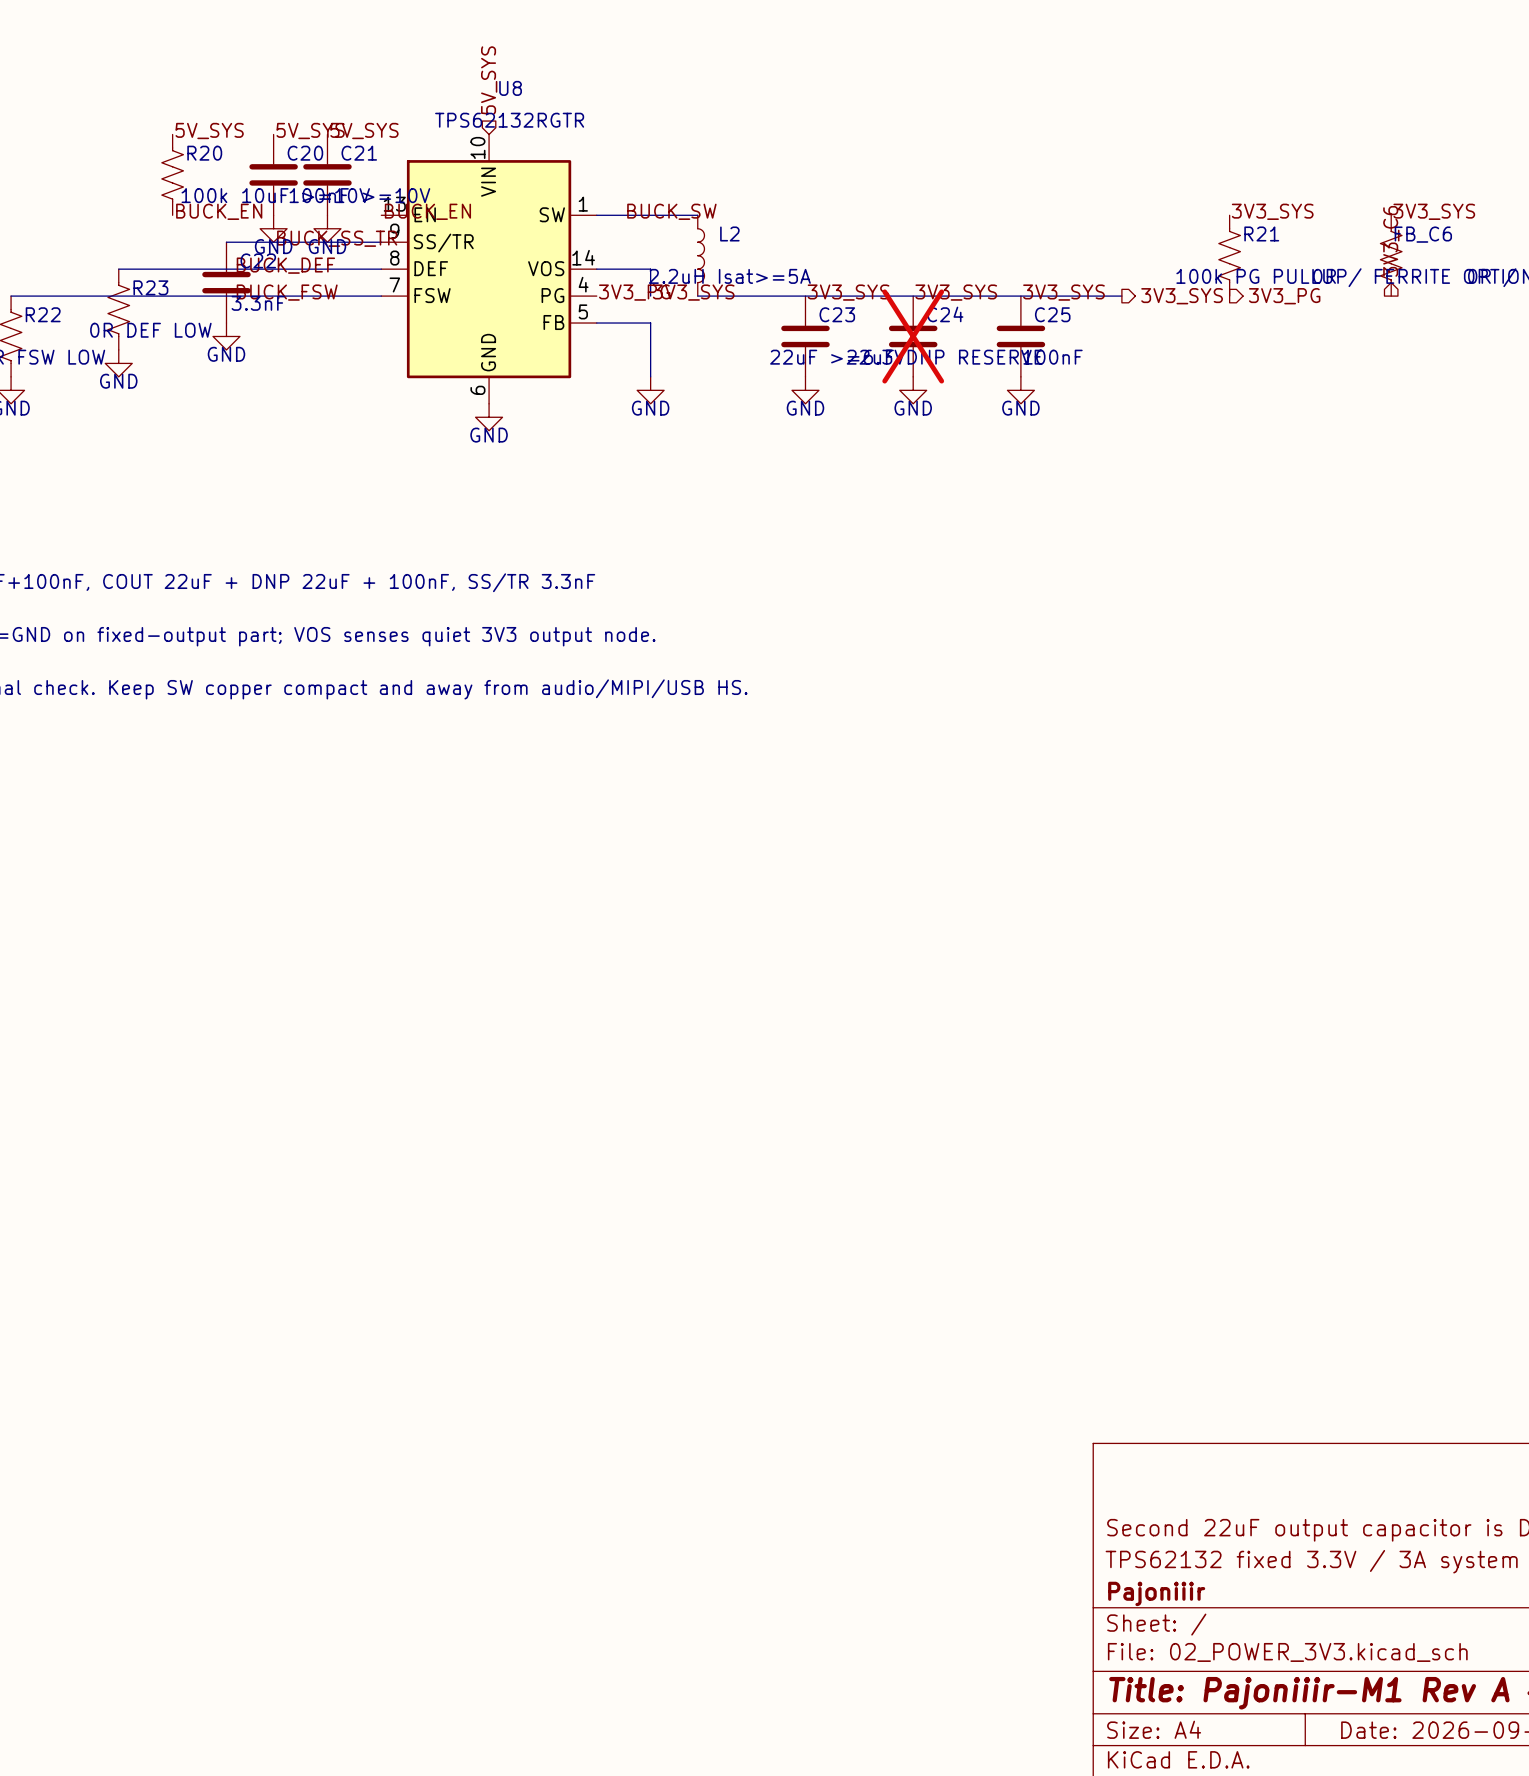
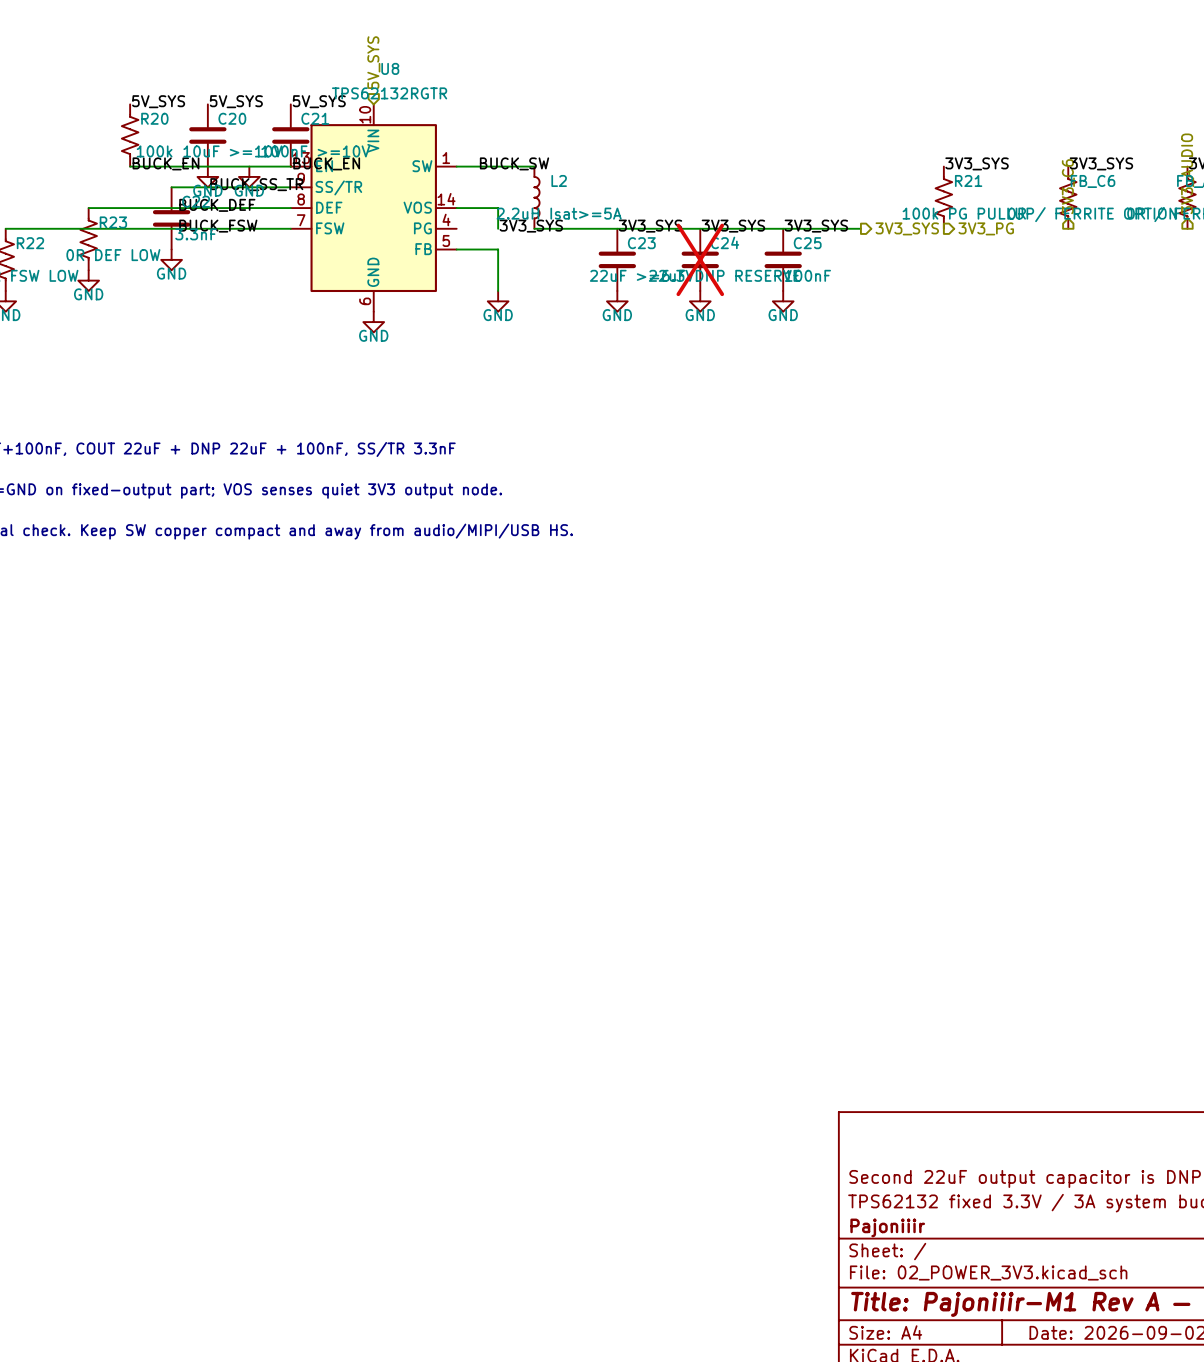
label position: 5V_SYS (364, 131) -> 5V_SYS (319, 101)
C21 position: (327, 174) -> (290, 135)
wire: none -> (130, 166) (290, 166)
label: 3V3_PG (634, 292) -> none

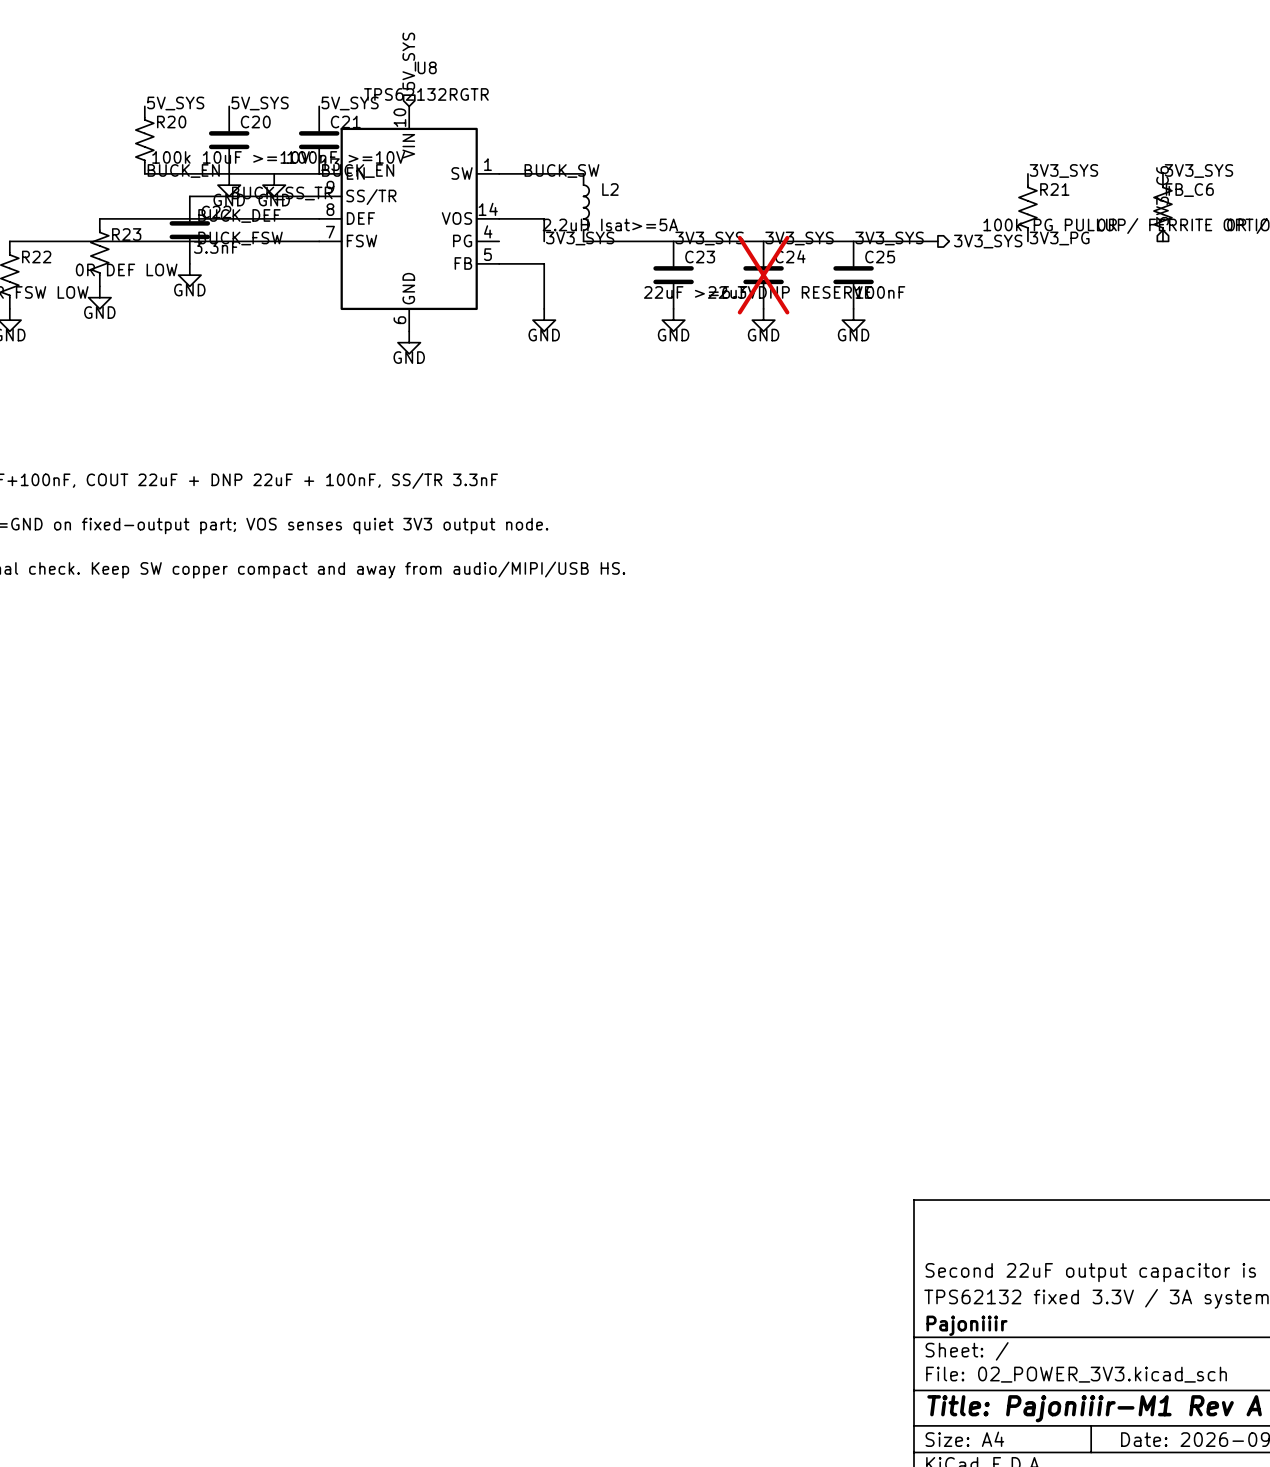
label: none -> 3V3_PG (1059, 238)
hierarchical label: 3V3_PG (986, 228) -> none

